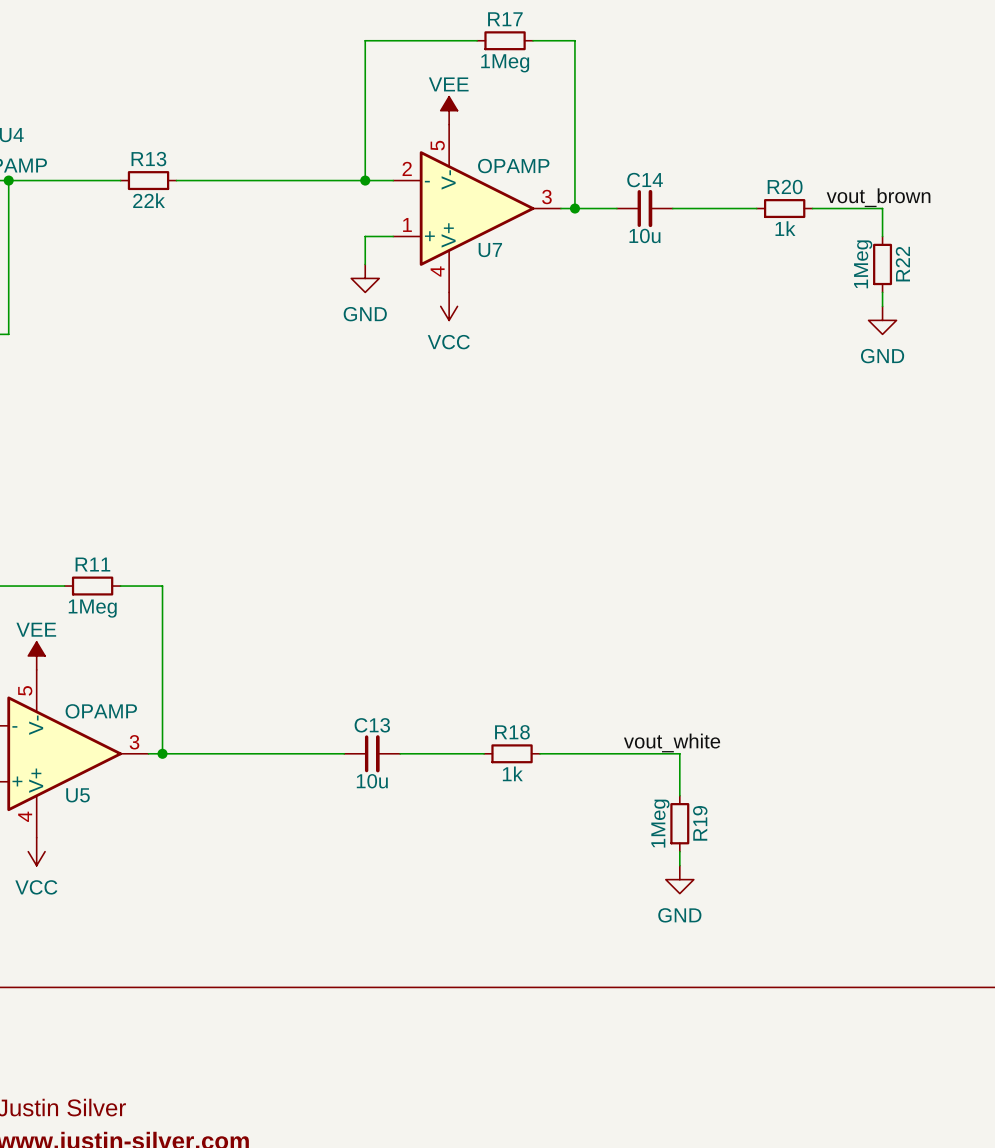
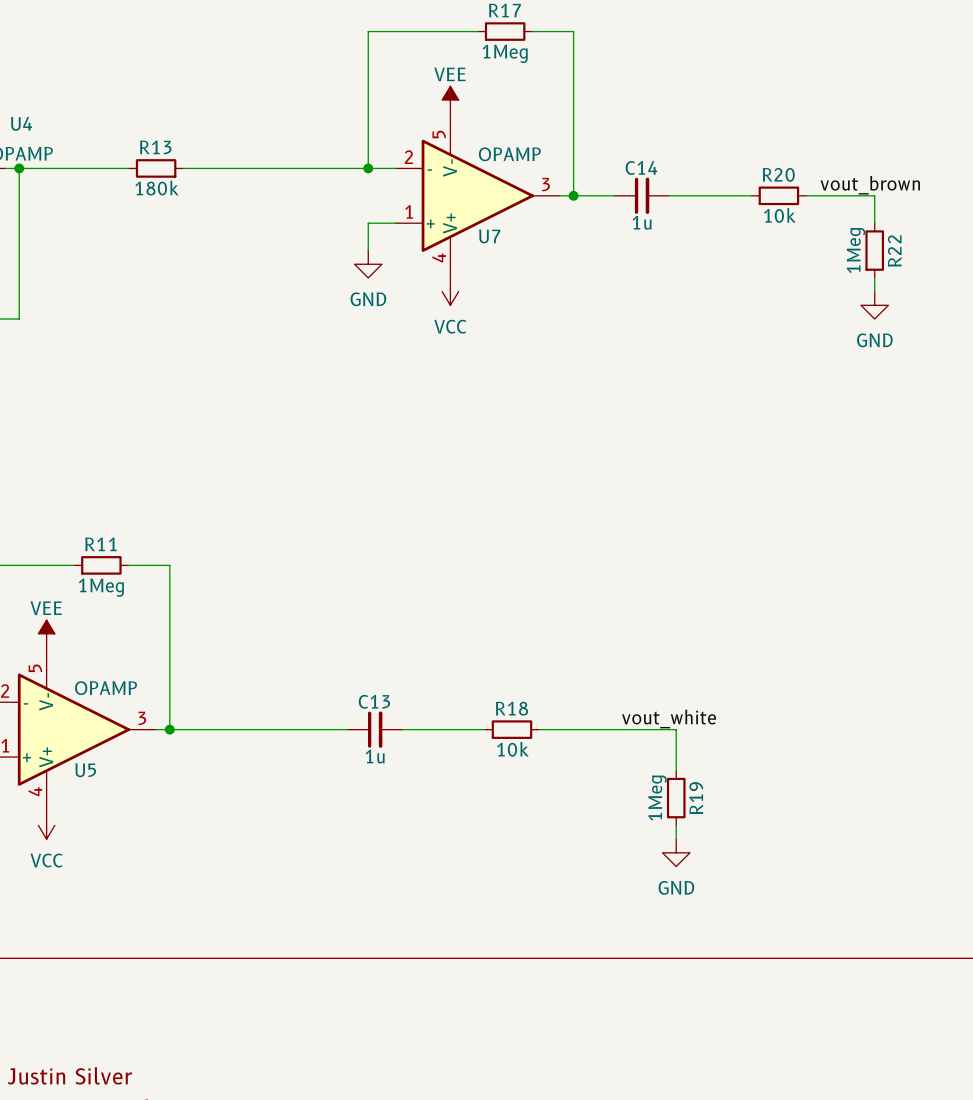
R13 value: 22k (149, 200) -> 180k (157, 188)
R20 value: 1k (785, 228) -> 10k (779, 215)
C14 value: 10u (644, 235) -> 1u (642, 222)
R18 value: 1k (512, 773) -> 10k (512, 749)
C13 value: 10u (372, 781) -> 1u (375, 756)

